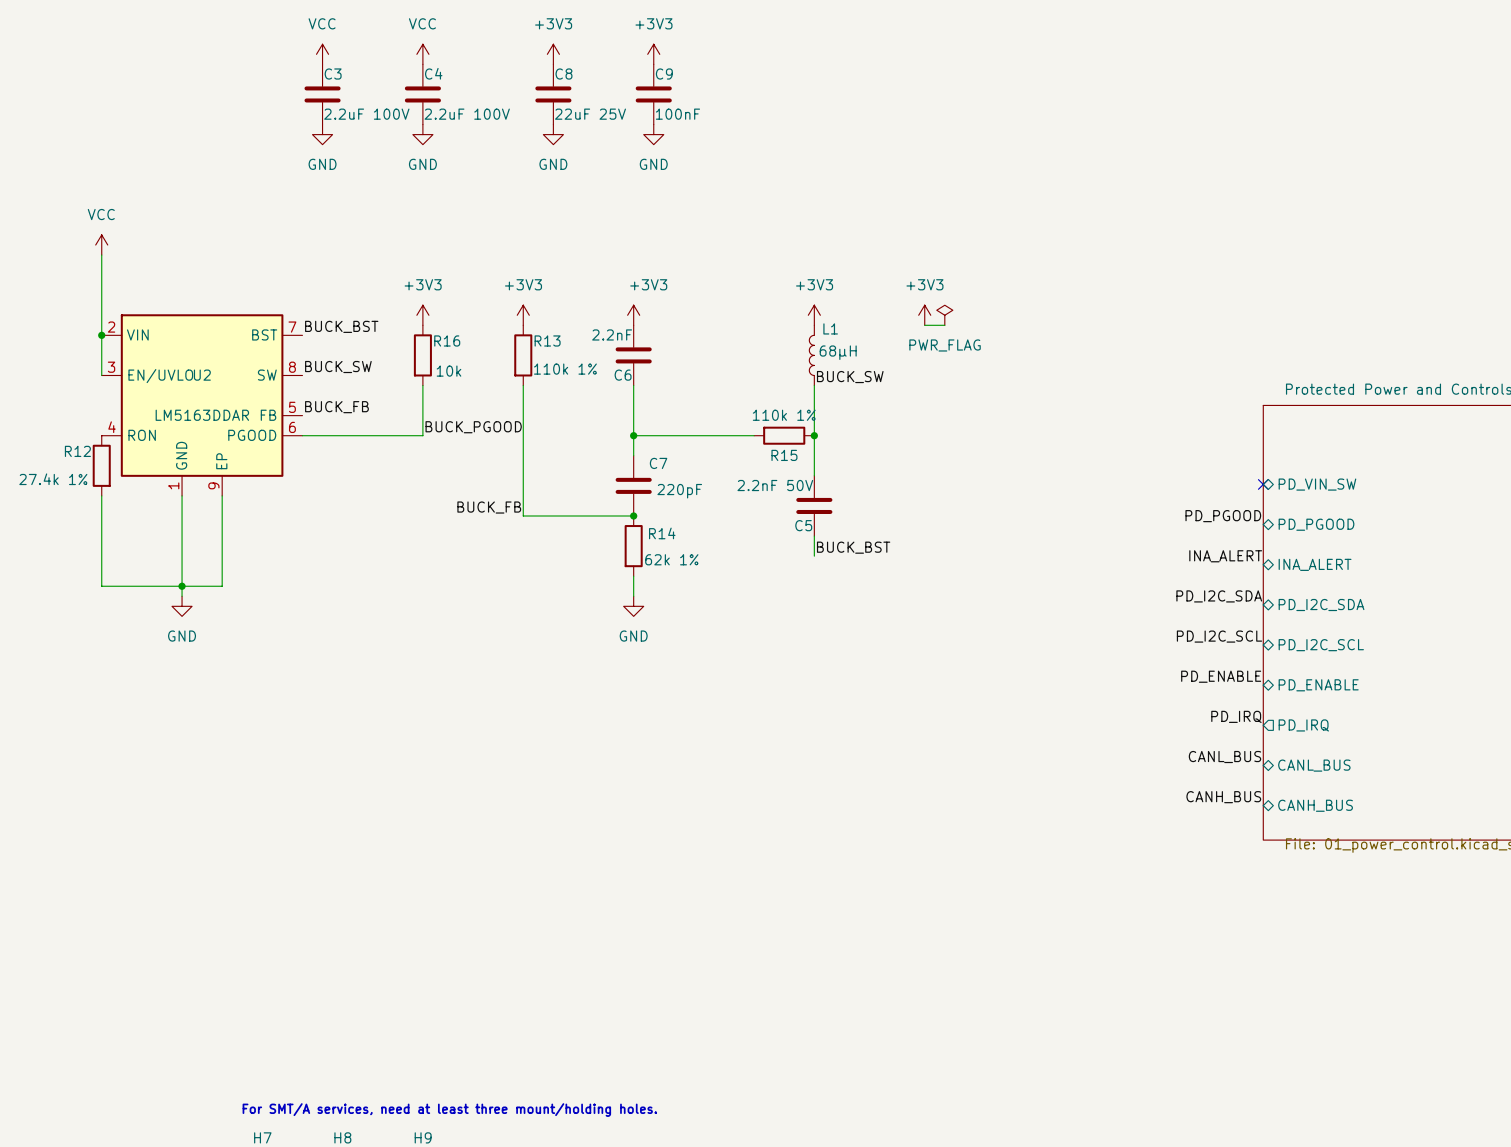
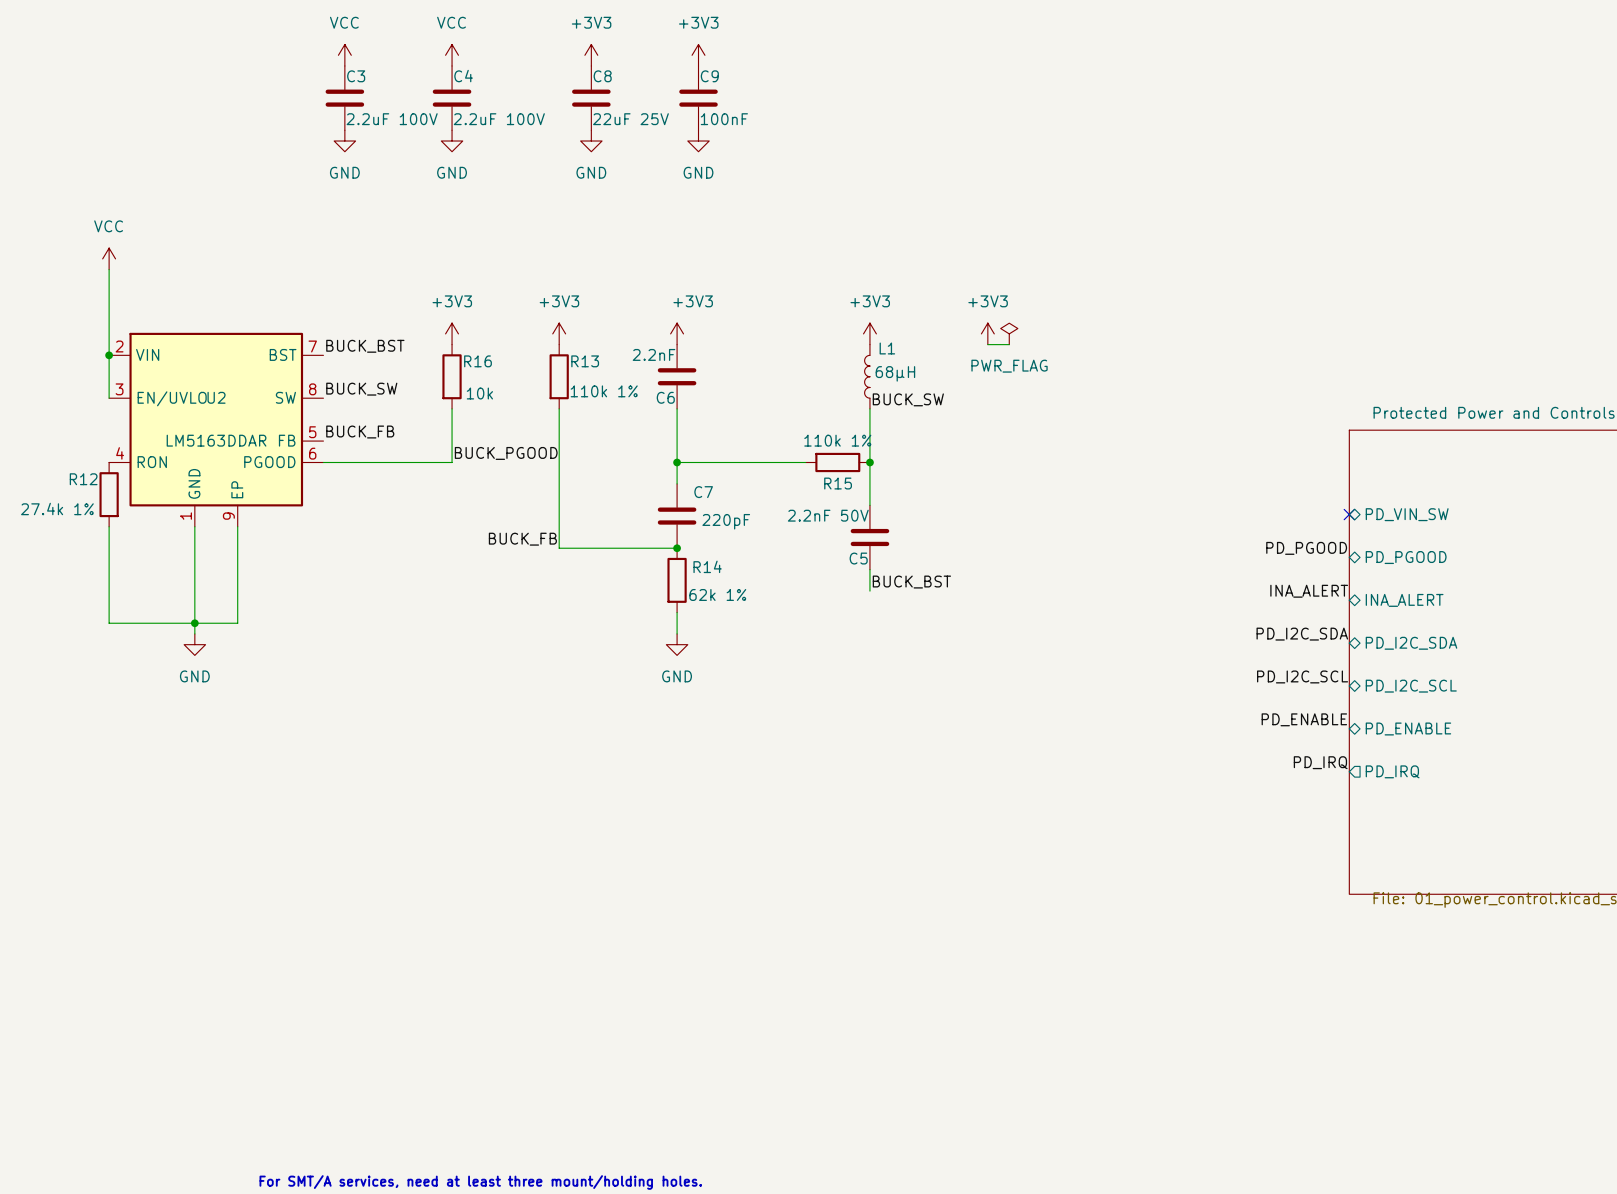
label: CANL_BUS (1224, 757) -> none
sheet pin: CANL_BUS (1314, 765) -> none
label: CANH_BUS (1223, 797) -> none
sheet pin: CANH_BUS (1315, 805) -> none

